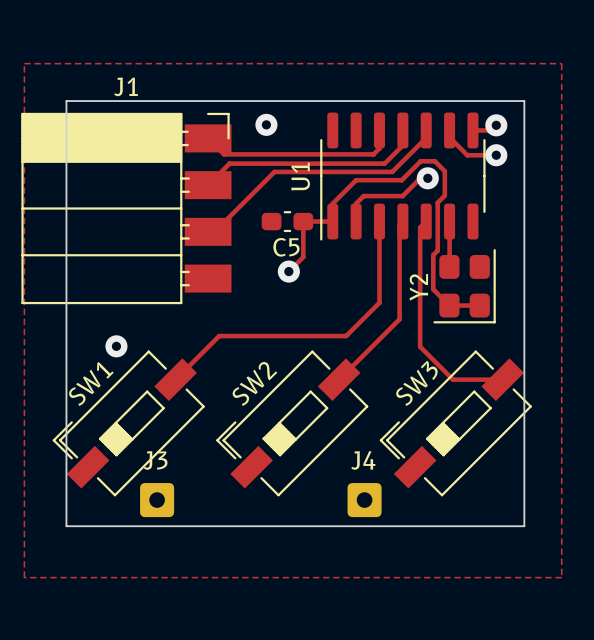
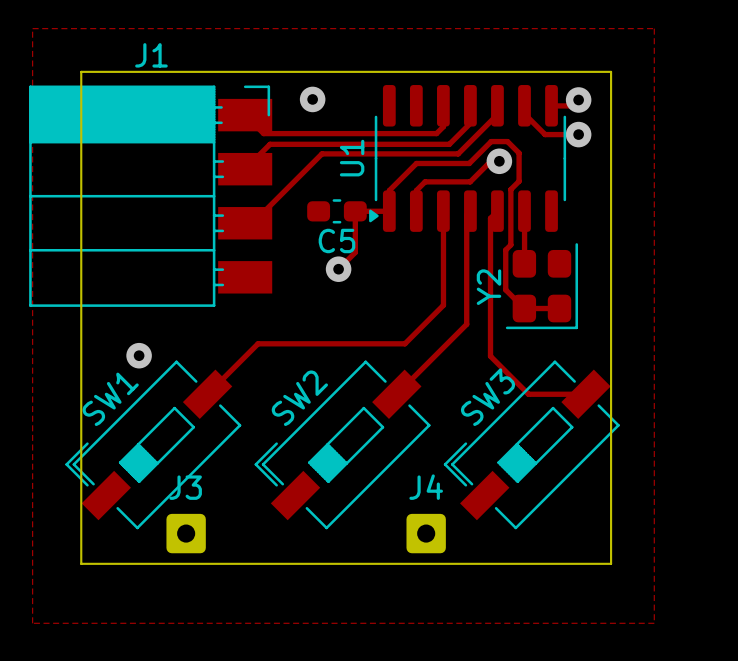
U1 footprint: [320, 112, 486, 241] -> [369, 85, 567, 232]

